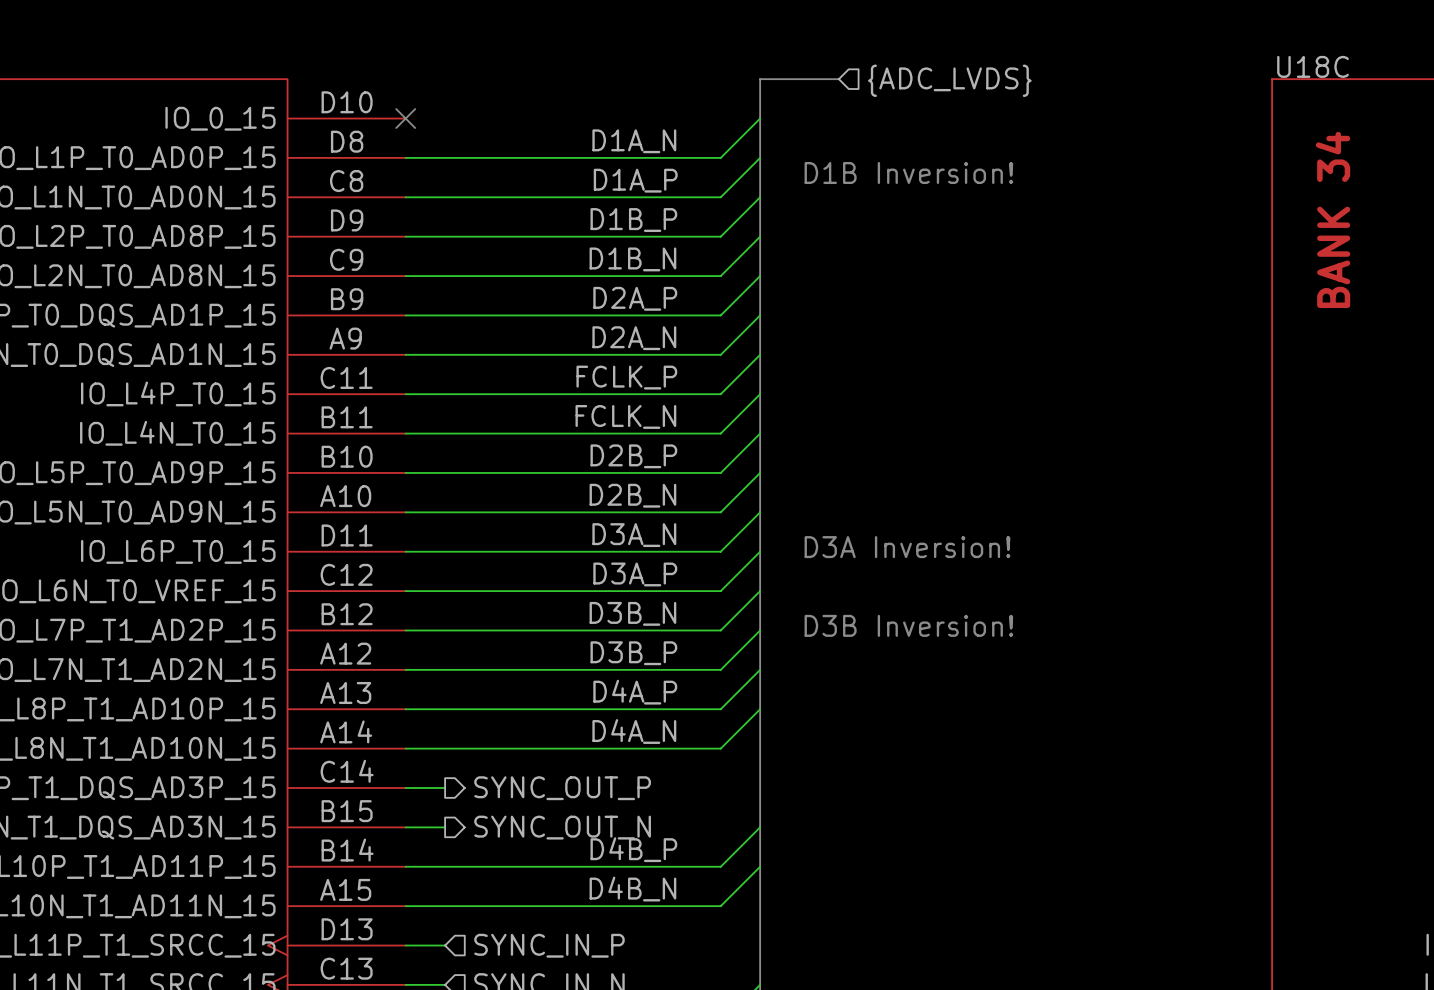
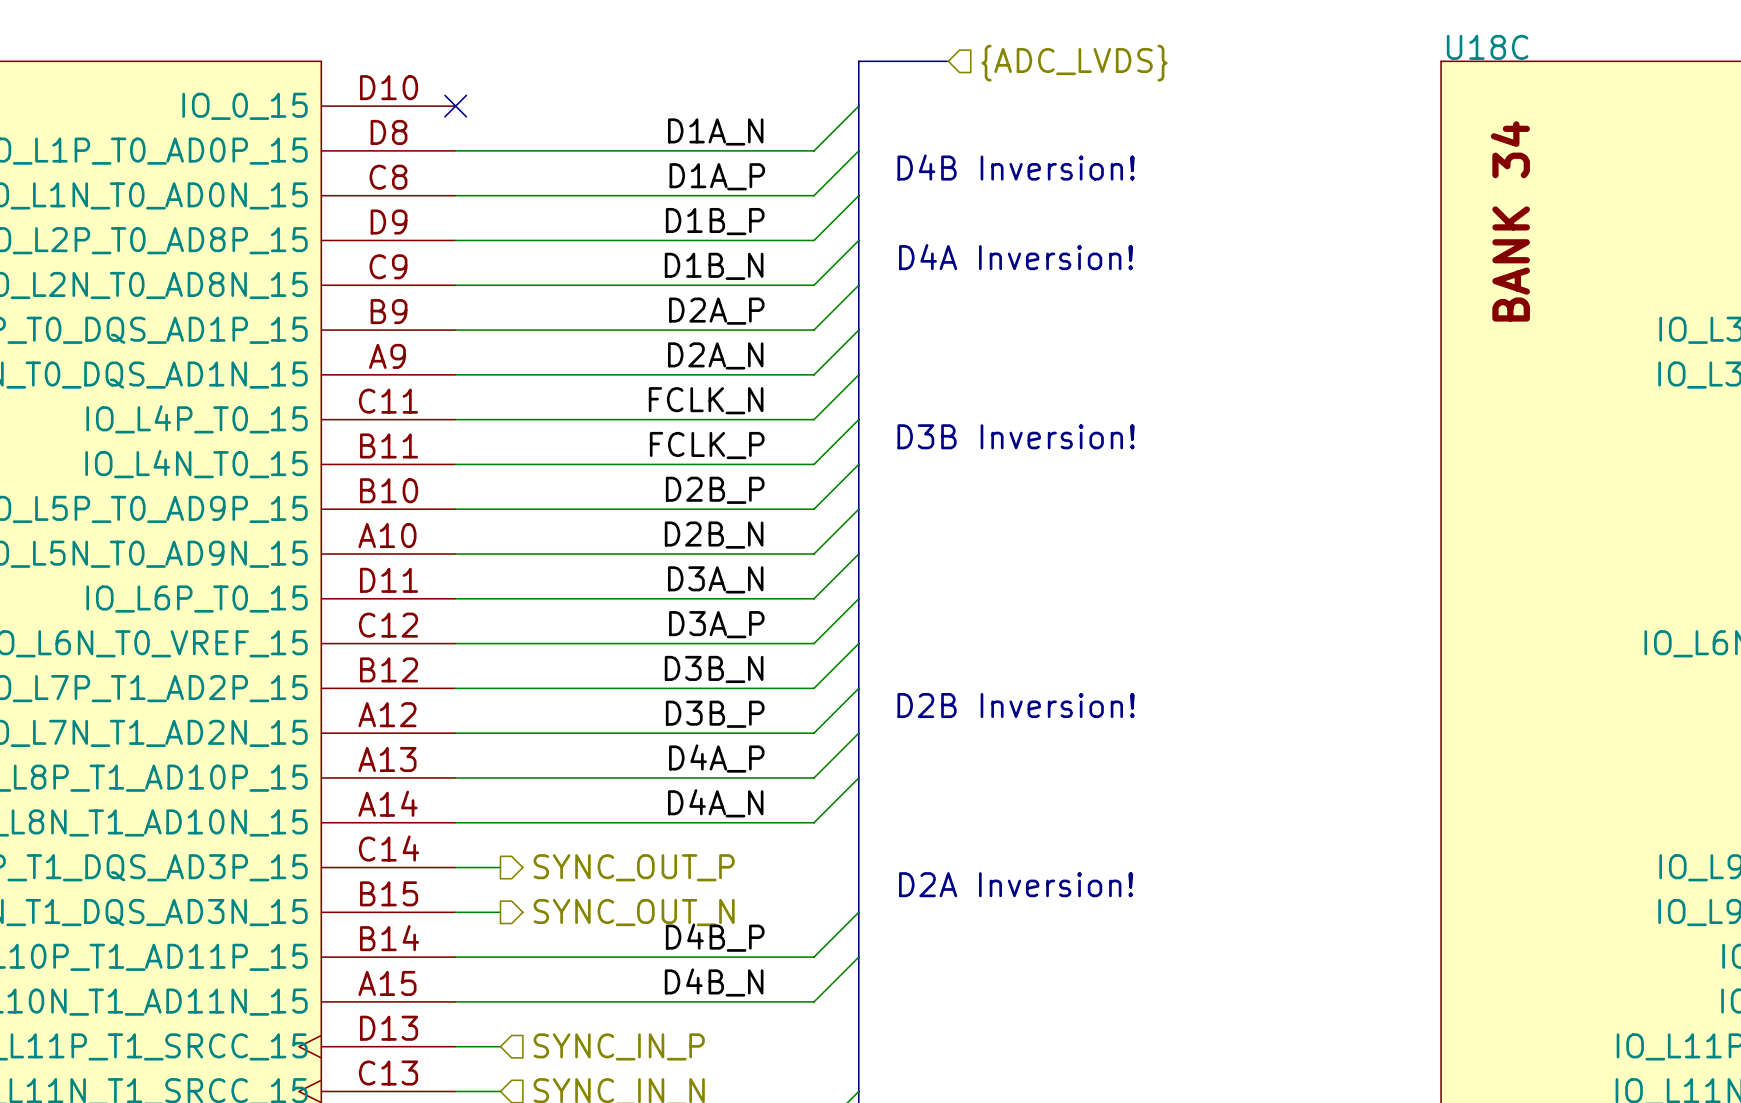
text: D1B Inversion! (908, 172) -> D4B Inversion! (1016, 167)
text: none -> D4A Inversion! (1016, 257)
label: FCLK_P (626, 377) -> FCLK_N (706, 400)
label: FCLK_N (625, 416) -> FCLK_P (707, 445)
text: D3A Inversion! (907, 547) -> none
text position: D3B Inversion! (908, 625) -> D3B Inversion! (1016, 436)
text: none -> D2B Inversion! (1016, 705)
text: none -> D2A Inversion! (1016, 884)

